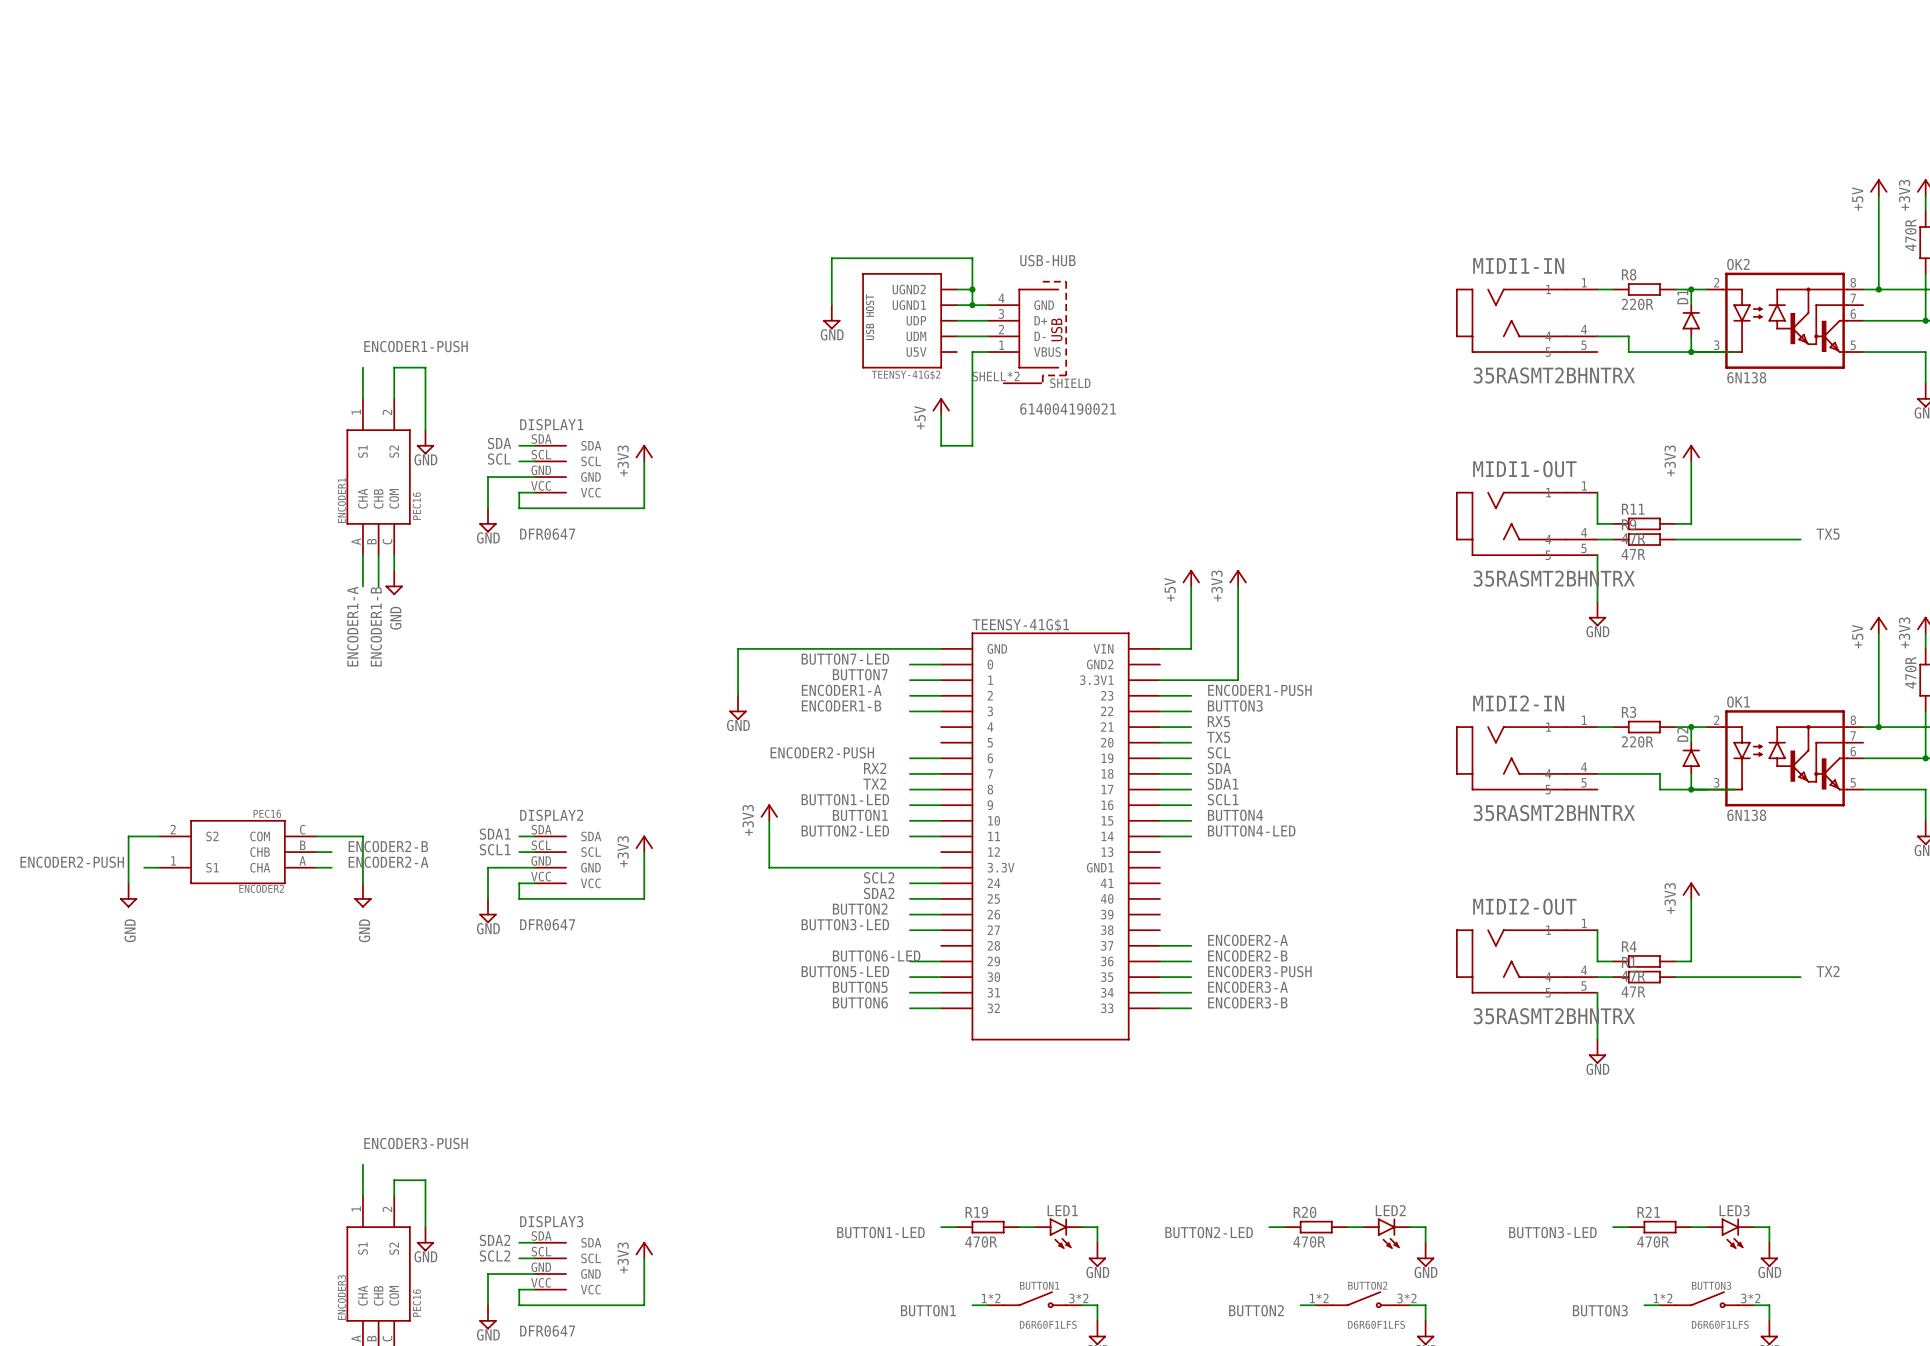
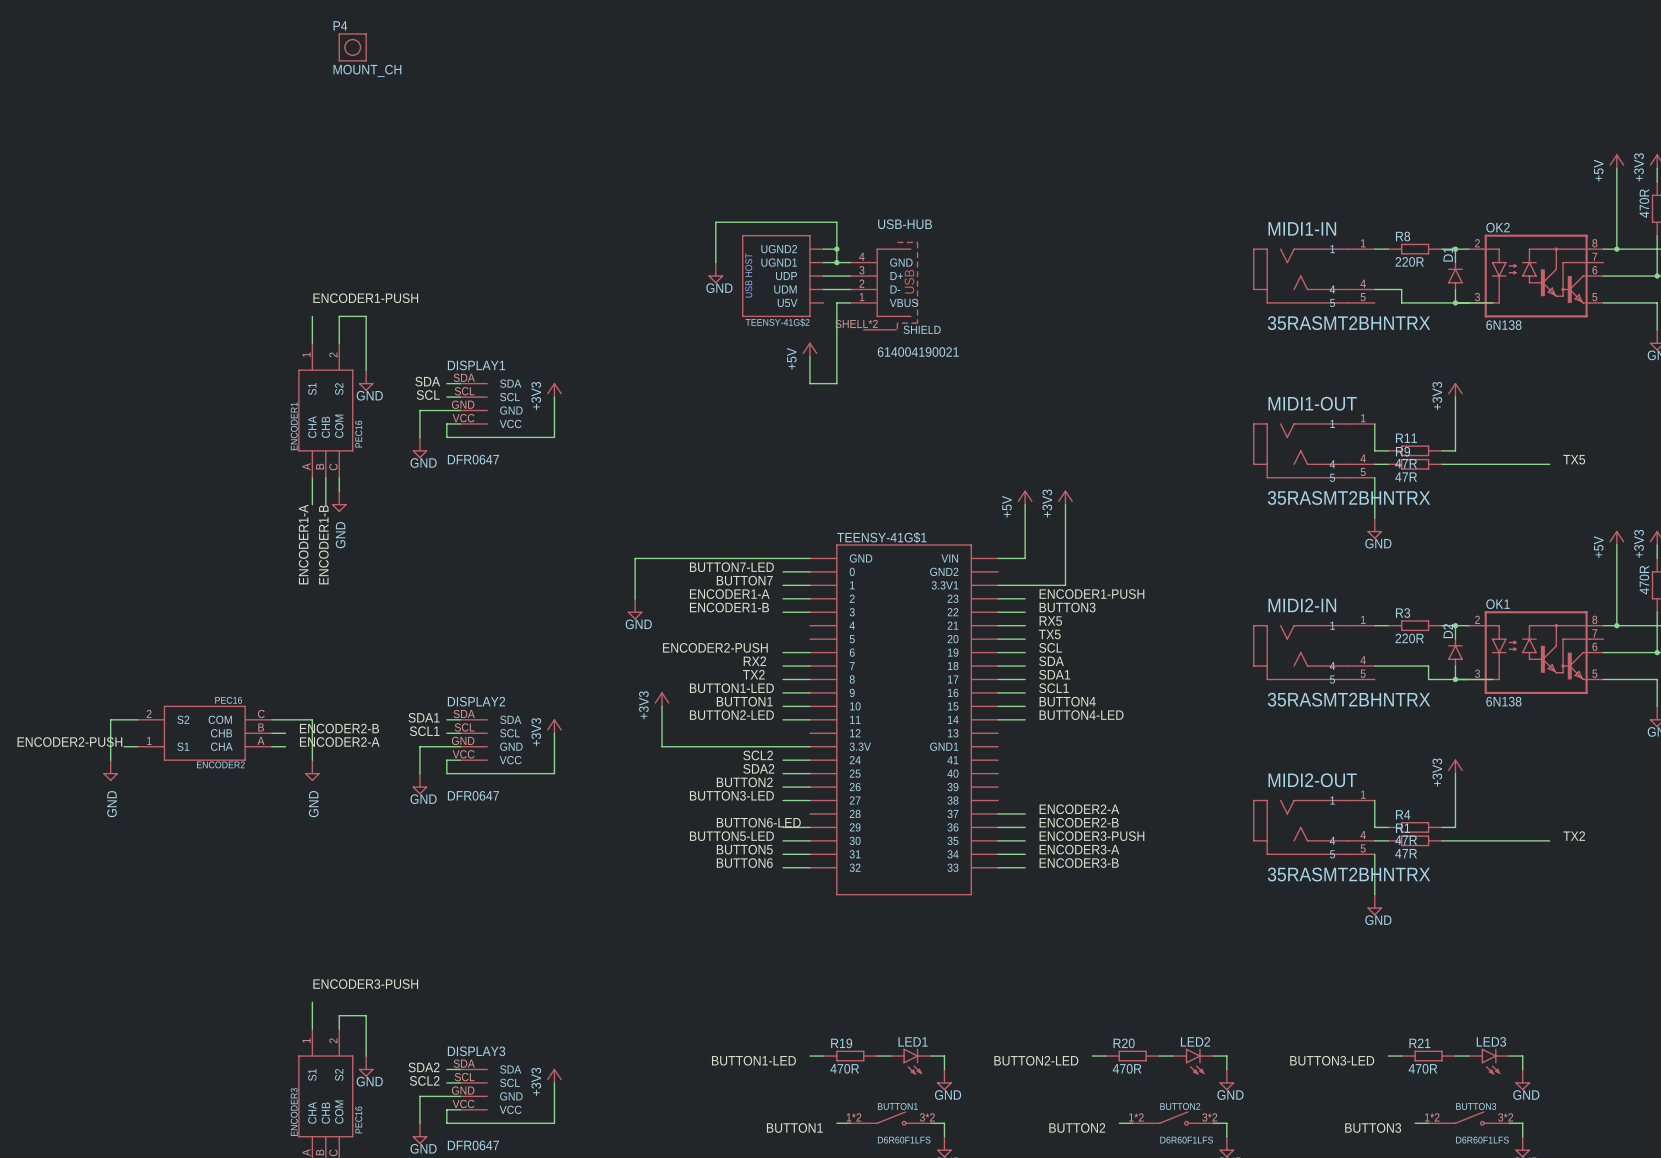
P4: none -> MOUNT_CH (352, 47)

